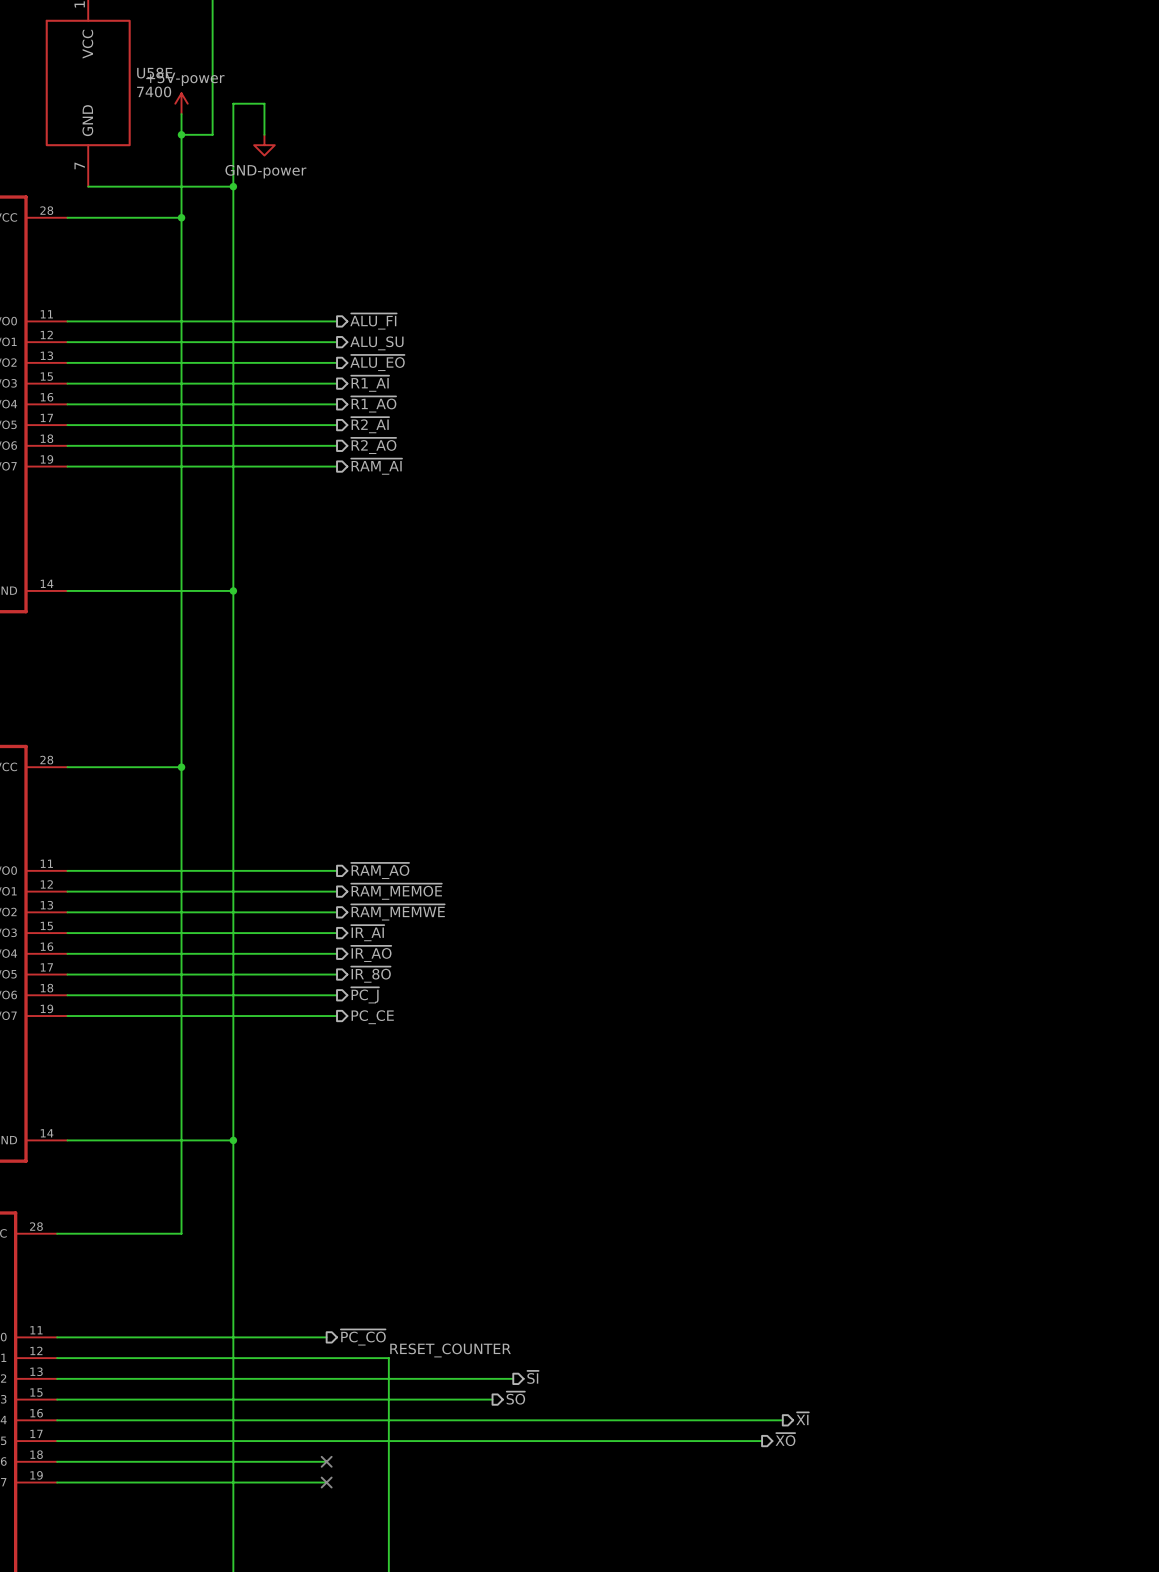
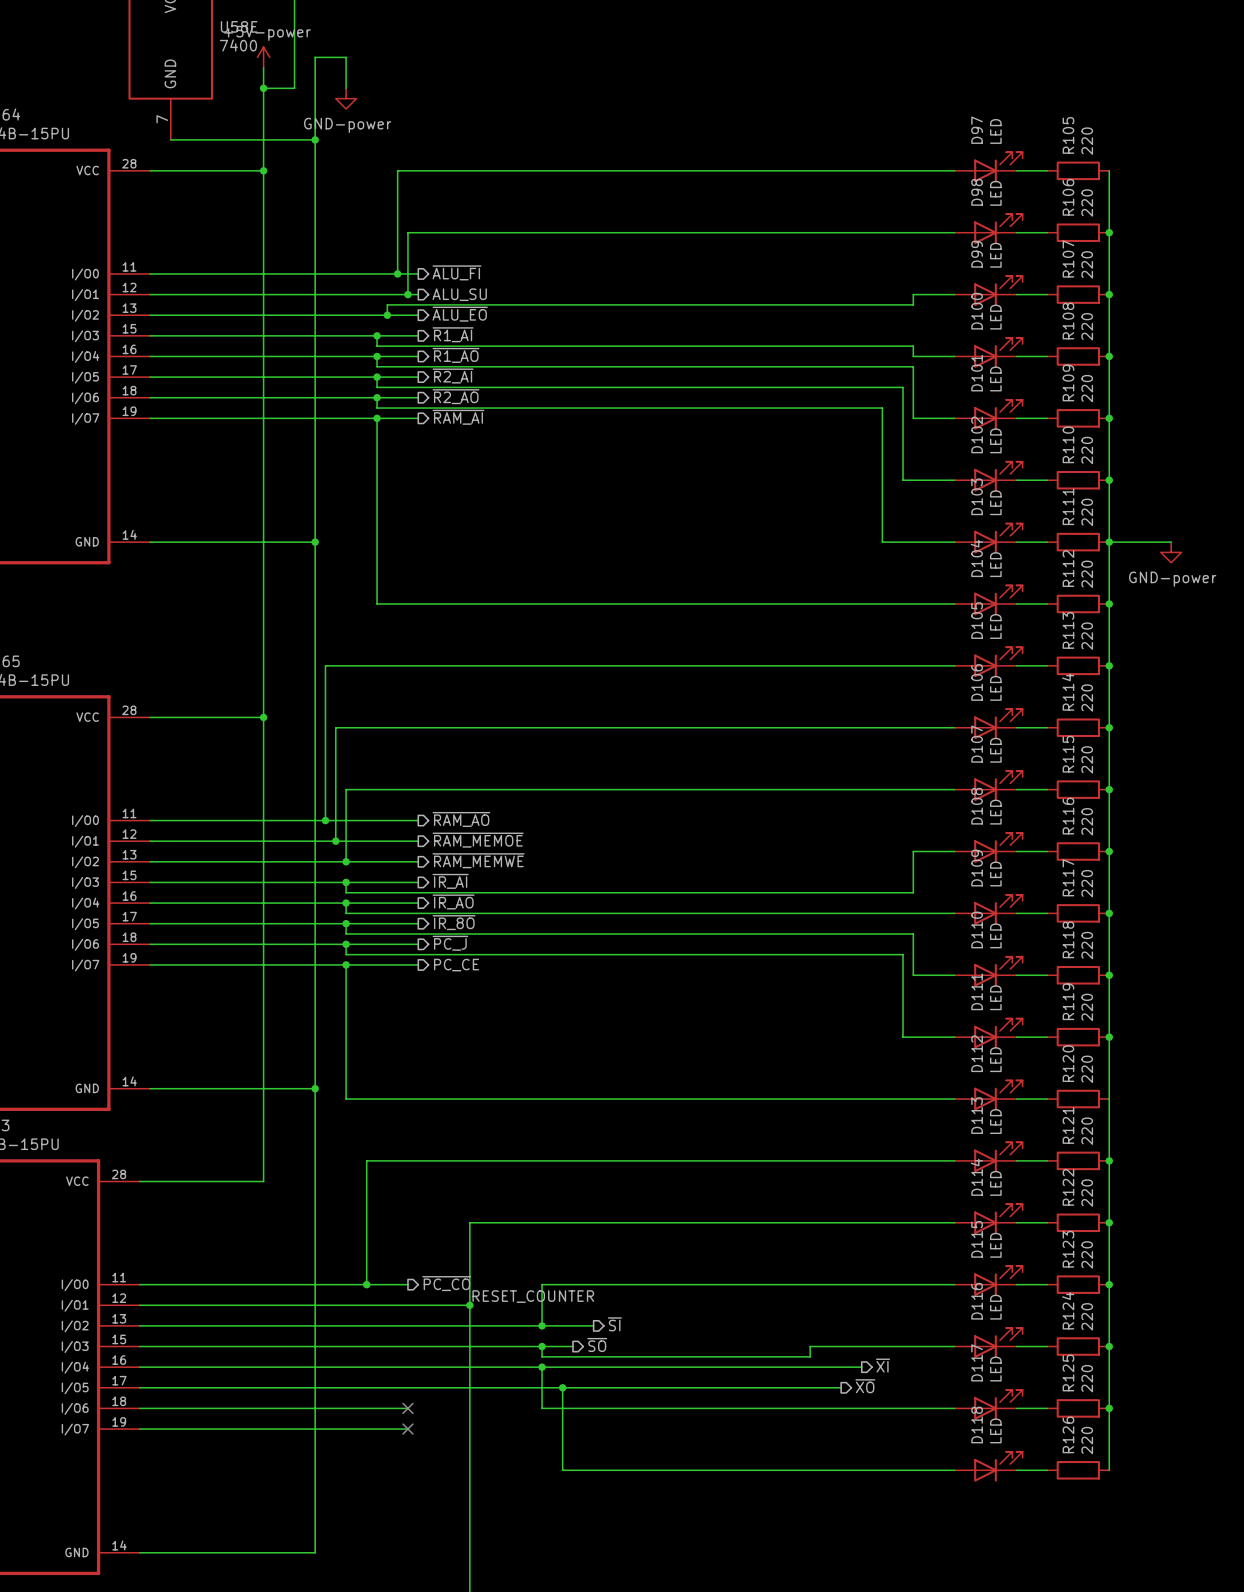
D97: none -> LED (988, 167)
wire: none -> (954, 170) (397, 170) (397, 273)
wire: none -> (1016, 170) (1047, 170)
R105: none -> 220 (1078, 170)
wire: none -> (1109, 170) (1109, 1470)
D98: none -> LED (988, 229)
wire: none -> (954, 232) (407, 232) (407, 294)
wire: none -> (1016, 232) (1047, 232)
R106: none -> 220 (1078, 232)
junction: none -> (1109, 232)
junction: none -> (397, 273)
D99: none -> LED (988, 290)
junction: none -> (407, 294)
wire: none -> (954, 294) (913, 294) (913, 304) (387, 304) (387, 315)
wire: none -> (1016, 294) (1047, 294)
R107: none -> 220 (1078, 294)
junction: none -> (1109, 294)
junction: none -> (387, 315)
wire: none -> (377, 335) (377, 346) (913, 346) (913, 356) (954, 356)
junction: none -> (377, 335)
D100: none -> LED (988, 352)
wire: none -> (377, 356) (377, 366) (913, 366) (913, 418) (954, 418)
junction: none -> (377, 356)
wire: none -> (1016, 356) (1047, 356)
R108: none -> 220 (1078, 356)
junction: none -> (1109, 356)
wire: none -> (377, 377) (377, 387) (903, 387) (903, 480) (954, 480)
junction: none -> (377, 377)
wire: none -> (377, 397) (377, 408) (882, 408) (882, 542) (954, 542)
junction: none -> (377, 397)
D101: none -> LED (988, 414)
wire: none -> (377, 418) (377, 603) (954, 603)
junction: none -> (377, 418)
wire: none -> (1016, 418) (1047, 418)
R109: none -> 220 (1078, 418)
junction: none -> (1109, 418)
D102: none -> LED (988, 476)
wire: none -> (1016, 480) (1047, 480)
R110: none -> 220 (1078, 480)
junction: none -> (1109, 480)
D103: none -> LED (988, 538)
wire: none -> (1016, 542) (1047, 542)
R111: none -> 220 (1078, 542)
wire: none -> (1109, 542) (1171, 542)
junction: none -> (1109, 542)
power symbol: none -> GND-power (1171, 552)
D104: none -> LED (988, 600)
wire: none -> (1016, 603) (1047, 603)
R112: none -> 220 (1078, 603)
junction: none -> (1109, 603)
D105: none -> LED (988, 662)
wire: none -> (954, 665) (325, 665) (325, 820)
wire: none -> (1016, 665) (1047, 665)
R113: none -> 220 (1078, 665)
junction: none -> (1109, 665)
D106: none -> LED (988, 724)
wire: none -> (954, 727) (335, 727) (335, 841)
wire: none -> (1016, 727) (1047, 727)
R114: none -> 220 (1078, 727)
junction: none -> (1109, 727)
D107: none -> LED (988, 786)
wire: none -> (954, 789) (346, 789) (346, 861)
wire: none -> (1016, 789) (1047, 789)
R115: none -> 220 (1078, 789)
junction: none -> (1109, 789)
junction: none -> (325, 820)
junction: none -> (335, 841)
D108: none -> LED (988, 847)
wire: none -> (954, 851) (913, 851) (913, 892) (346, 892) (346, 882)
wire: none -> (1016, 851) (1047, 851)
R116: none -> 220 (1078, 851)
junction: none -> (1109, 851)
junction: none -> (346, 861)
junction: none -> (346, 882)
wire: none -> (346, 903) (346, 913) (954, 913)
junction: none -> (346, 903)
D109: none -> LED (988, 909)
wire: none -> (1016, 913) (1047, 913)
R117: none -> 220 (1078, 913)
junction: none -> (1109, 913)
wire: none -> (346, 923) (346, 934) (913, 934) (913, 975) (954, 975)
junction: none -> (346, 923)
wire: none -> (346, 944) (346, 954) (903, 954) (903, 1037) (954, 1037)
junction: none -> (346, 944)
wire: none -> (346, 964) (346, 1099) (954, 1099)
junction: none -> (346, 964)
D110: none -> LED (988, 971)
wire: none -> (1016, 975) (1047, 975)
R118: none -> 220 (1078, 975)
junction: none -> (1109, 975)
D111: none -> LED (988, 1033)
wire: none -> (1016, 1037) (1047, 1037)
R119: none -> 220 (1078, 1037)
junction: none -> (1109, 1037)
D112: none -> LED (988, 1095)
wire: none -> (1016, 1099) (1047, 1099)
R120: none -> 220 (1078, 1099)
D113: none -> LED (988, 1157)
wire: none -> (954, 1160) (366, 1160) (366, 1284)
wire: none -> (1016, 1160) (1047, 1160)
R121: none -> 220 (1078, 1160)
junction: none -> (1109, 1160)
D114: none -> LED (988, 1219)
wire: none -> (954, 1222) (469, 1222) (469, 1305)
wire: none -> (1016, 1222) (1047, 1222)
R122: none -> 220 (1078, 1222)
junction: none -> (1109, 1222)
D115: none -> LED (988, 1281)
junction: none -> (366, 1284)
wire: none -> (954, 1284) (542, 1284) (542, 1325)
wire: none -> (1016, 1284) (1047, 1284)
R123: none -> 220 (1078, 1284)
junction: none -> (1109, 1284)
junction: none -> (469, 1305)
junction: none -> (542, 1325)
D116: none -> LED (988, 1342)
wire: none -> (542, 1346) (542, 1356) (810, 1356) (810, 1346) (954, 1346)
junction: none -> (542, 1346)
wire: none -> (1016, 1346) (1047, 1346)
R124: none -> 220 (1078, 1346)
junction: none -> (1109, 1346)
wire: none -> (542, 1367) (542, 1408) (954, 1408)
junction: none -> (542, 1367)
wire: none -> (562, 1387) (562, 1470) (954, 1470)
junction: none -> (562, 1387)
D117: none -> LED (988, 1404)
wire: none -> (1016, 1408) (1047, 1408)
R125: none -> 220 (1078, 1408)
junction: none -> (1109, 1408)
D118: none -> LED (988, 1466)
wire: none -> (1016, 1470) (1047, 1470)
R126: none -> 220 (1078, 1470)

